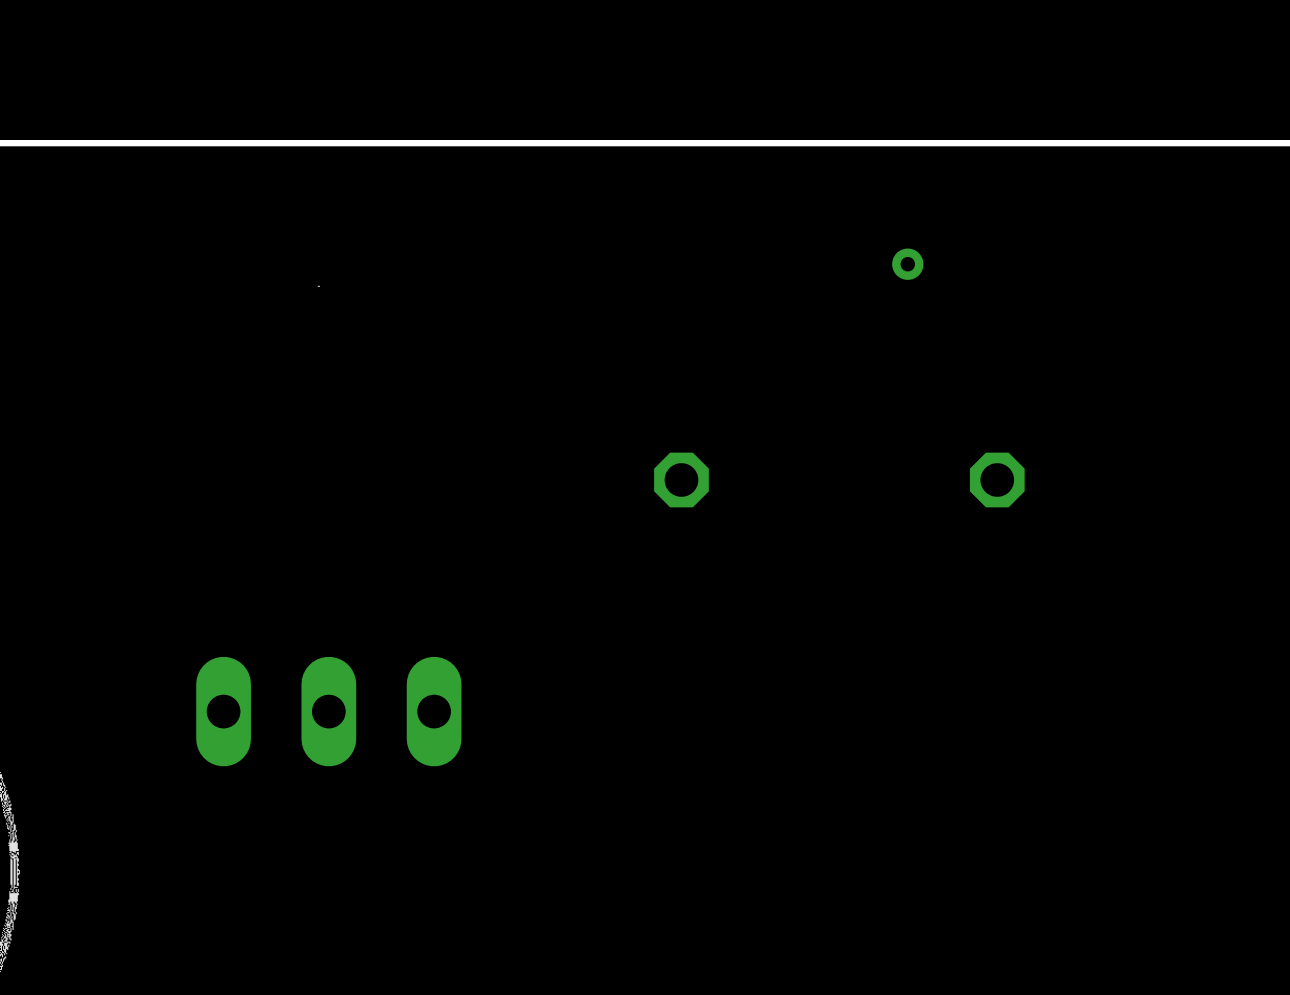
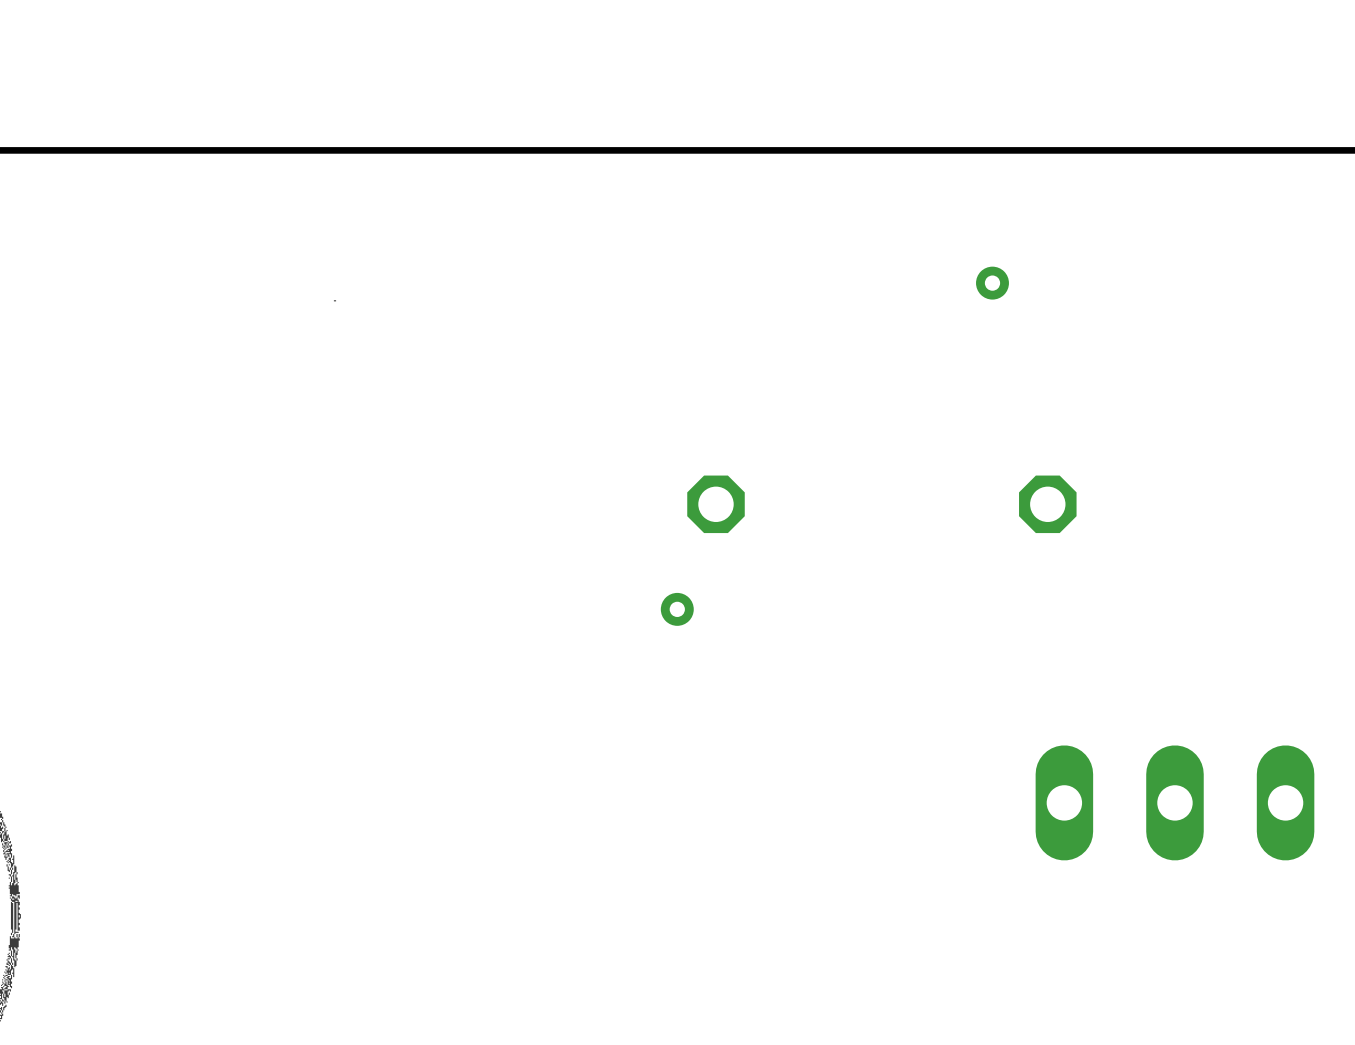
via position: (907, 264) -> (992, 283)
via: none -> (677, 609)
part position: (328, 711) -> (1174, 802)

